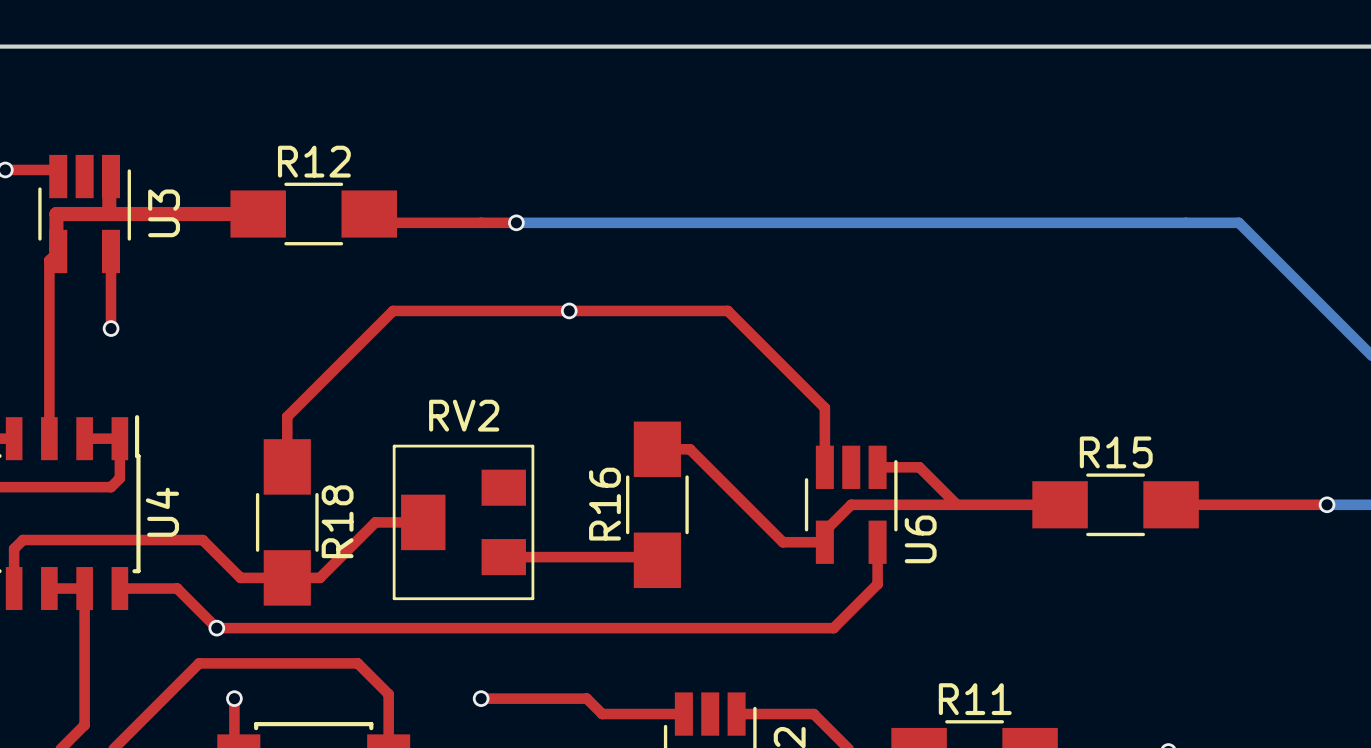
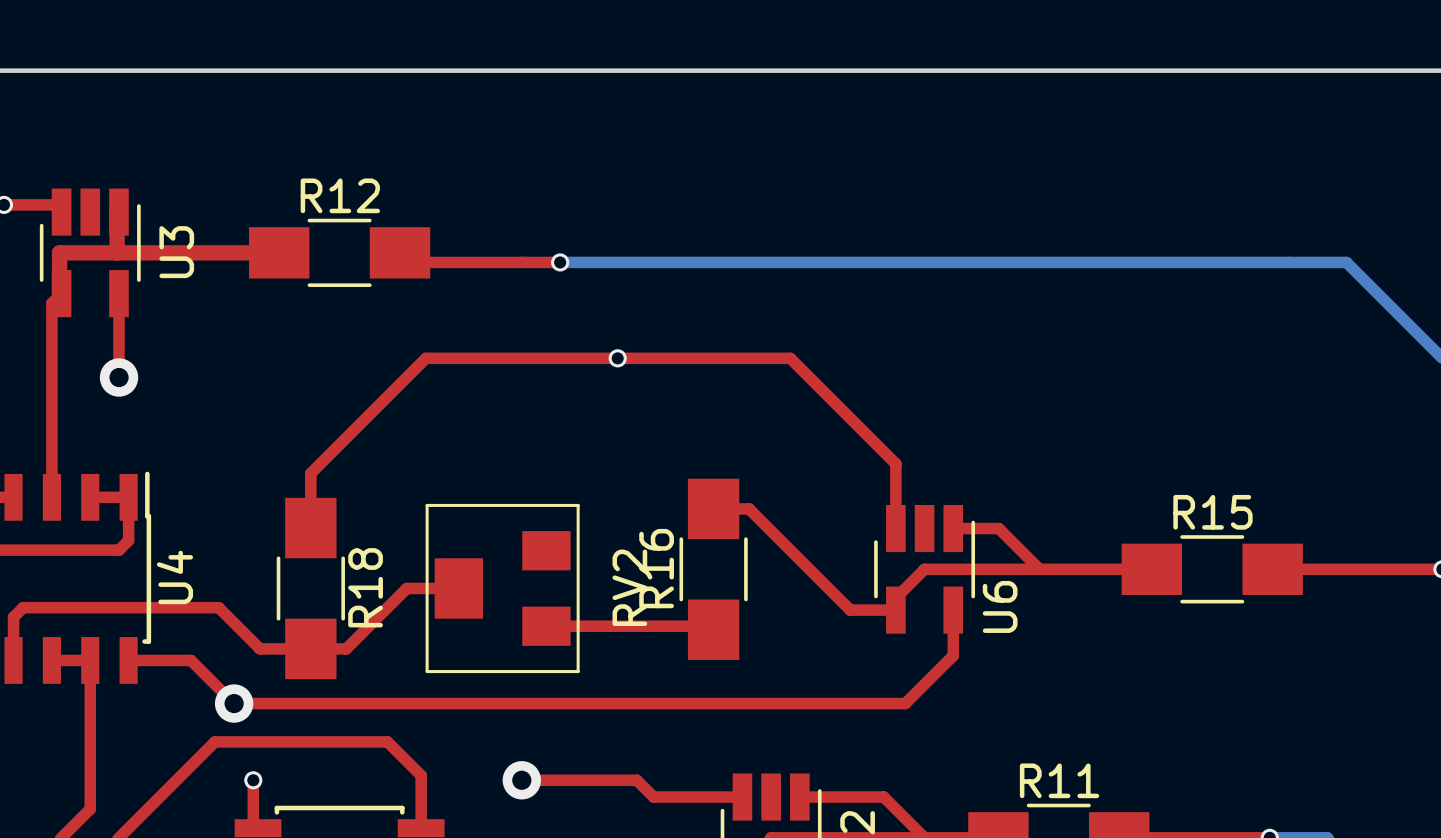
via size: [102, 320, 120, 337] -> [99, 358, 139, 397]
RV2 name rotation: 0° (464, 415) -> 90° counterclockwise (629, 587)
RV2 name position: RV2 (464, 415) -> RV2 (629, 587)
via size: [208, 619, 226, 637] -> [214, 684, 254, 723]
via size: [472, 690, 490, 707] -> [502, 761, 541, 800]

